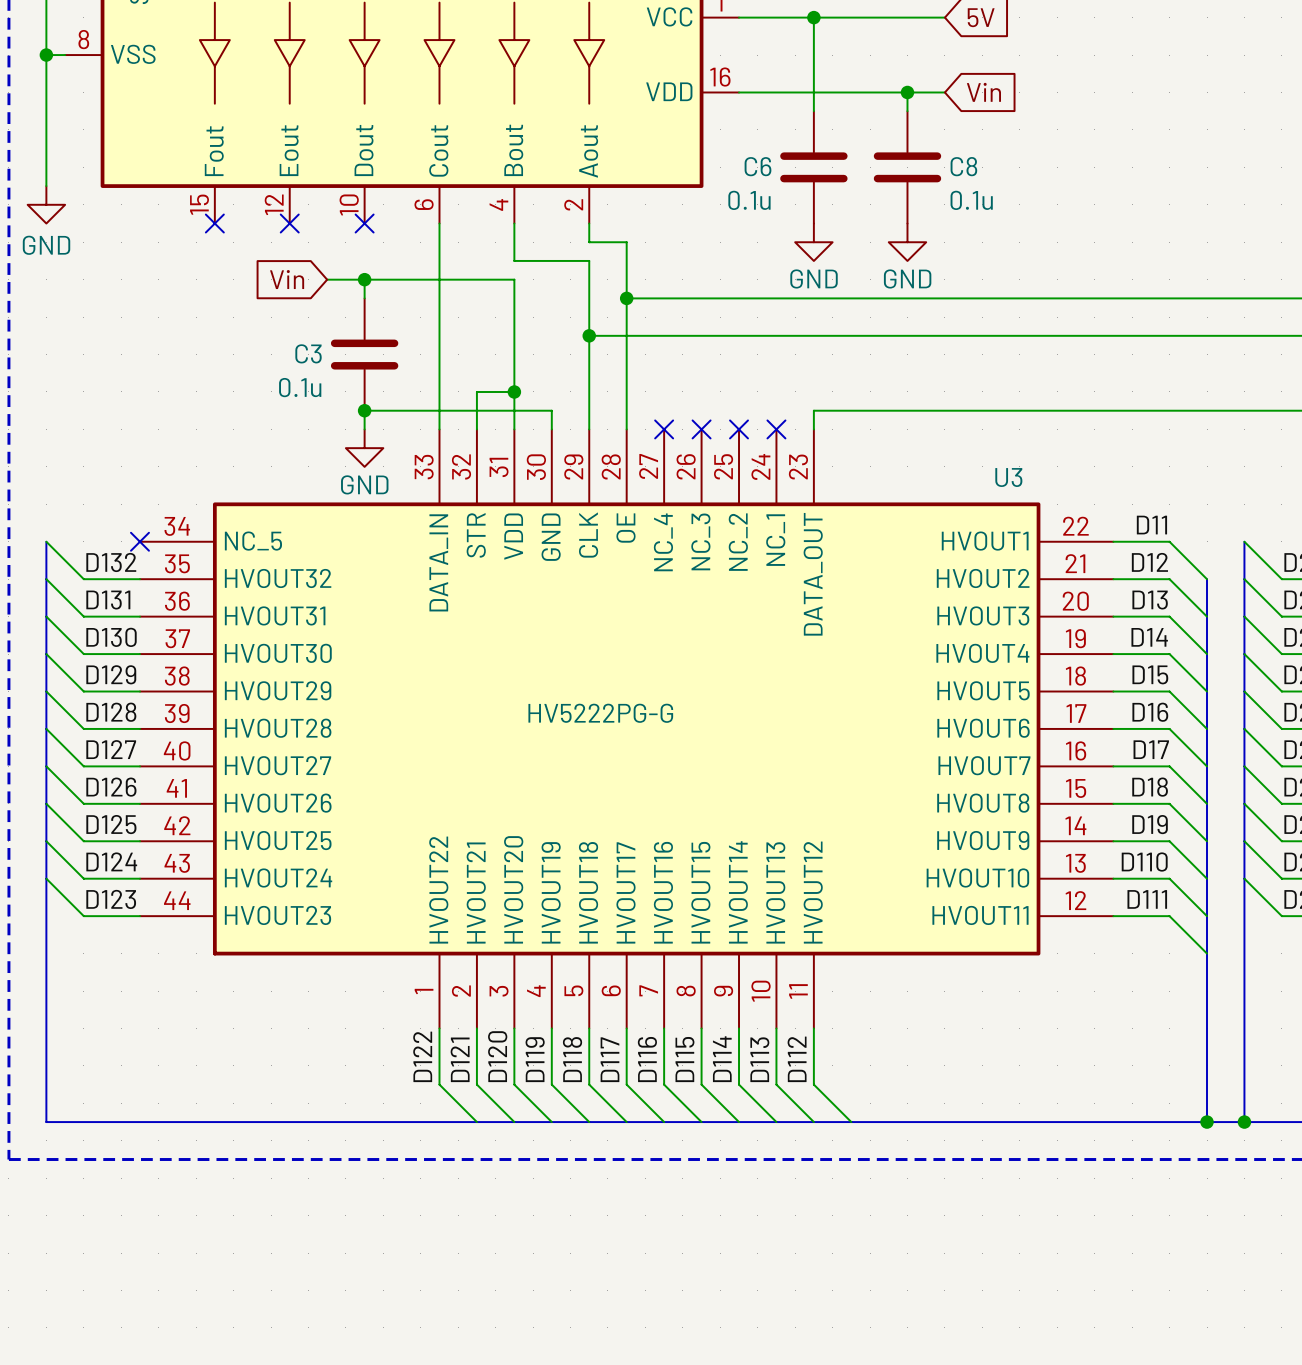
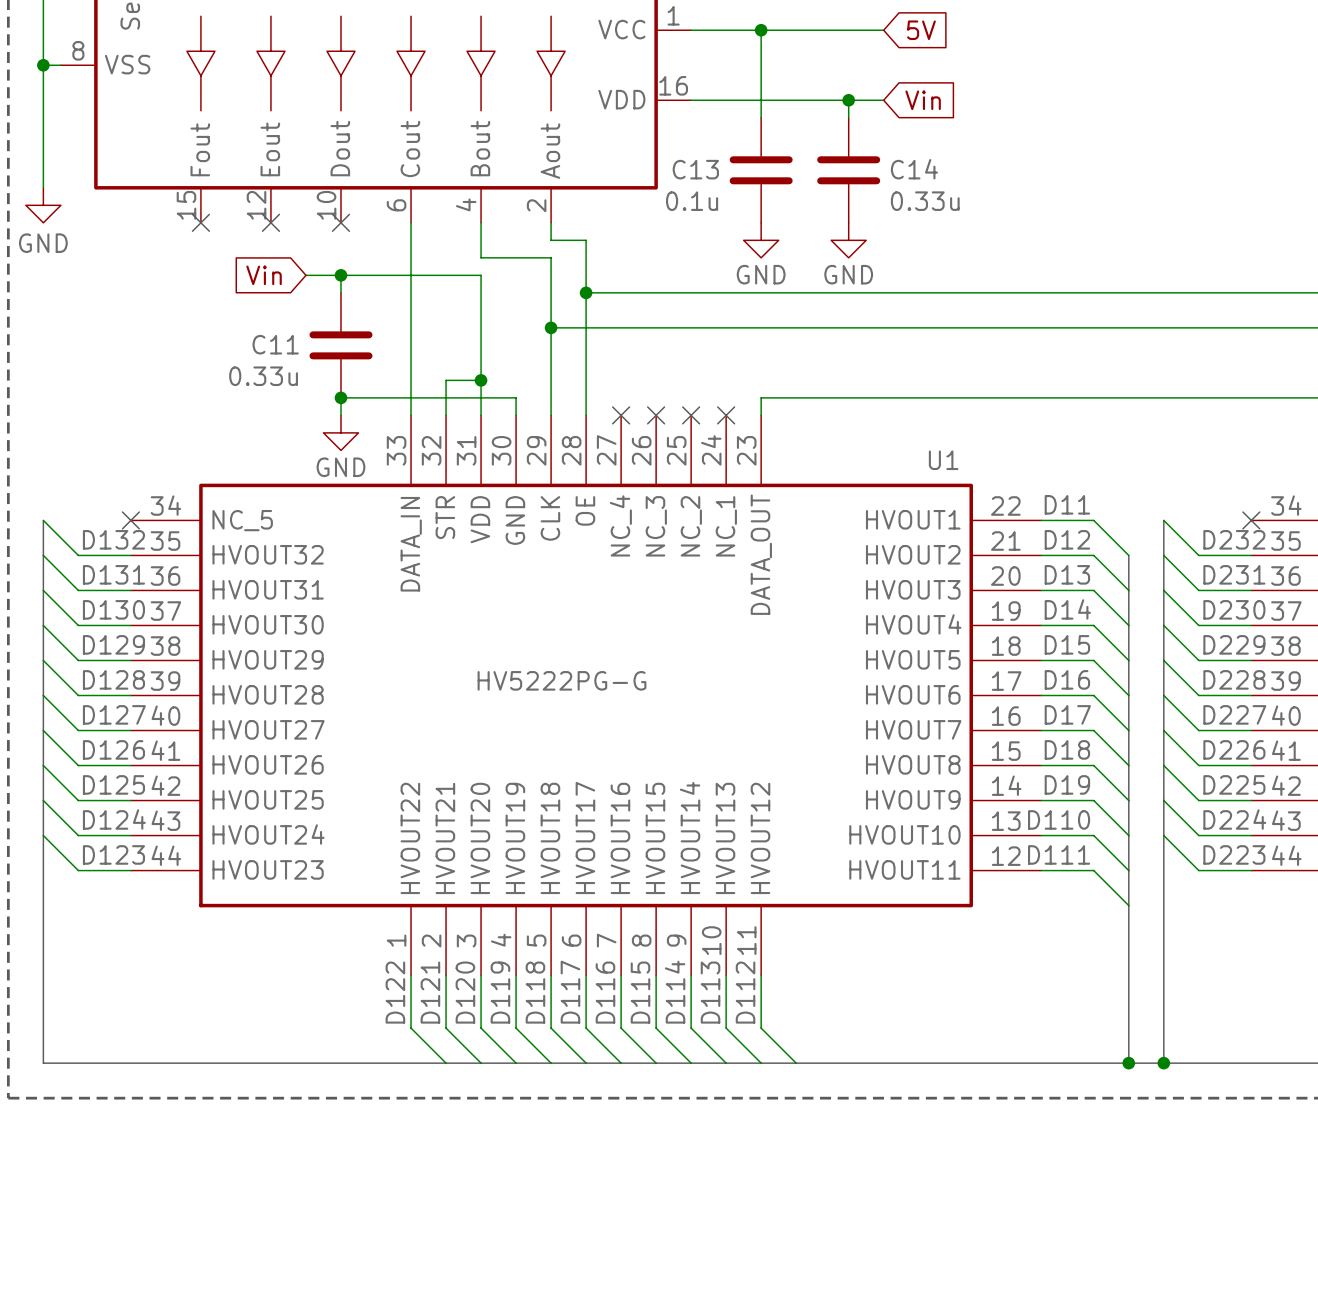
C6 name: C6 (757, 166) -> C13 (695, 169)
C8 name: C8 (963, 166) -> C14 (914, 169)
C8 value: 0.1u (971, 200) -> 0.33u (925, 201)
C3 name: C3 (308, 353) -> C11 (275, 344)
C3 value: 0.1u (300, 387) -> 0.33u (263, 376)
U3 name: U3 (1008, 477) -> U1 (943, 460)

